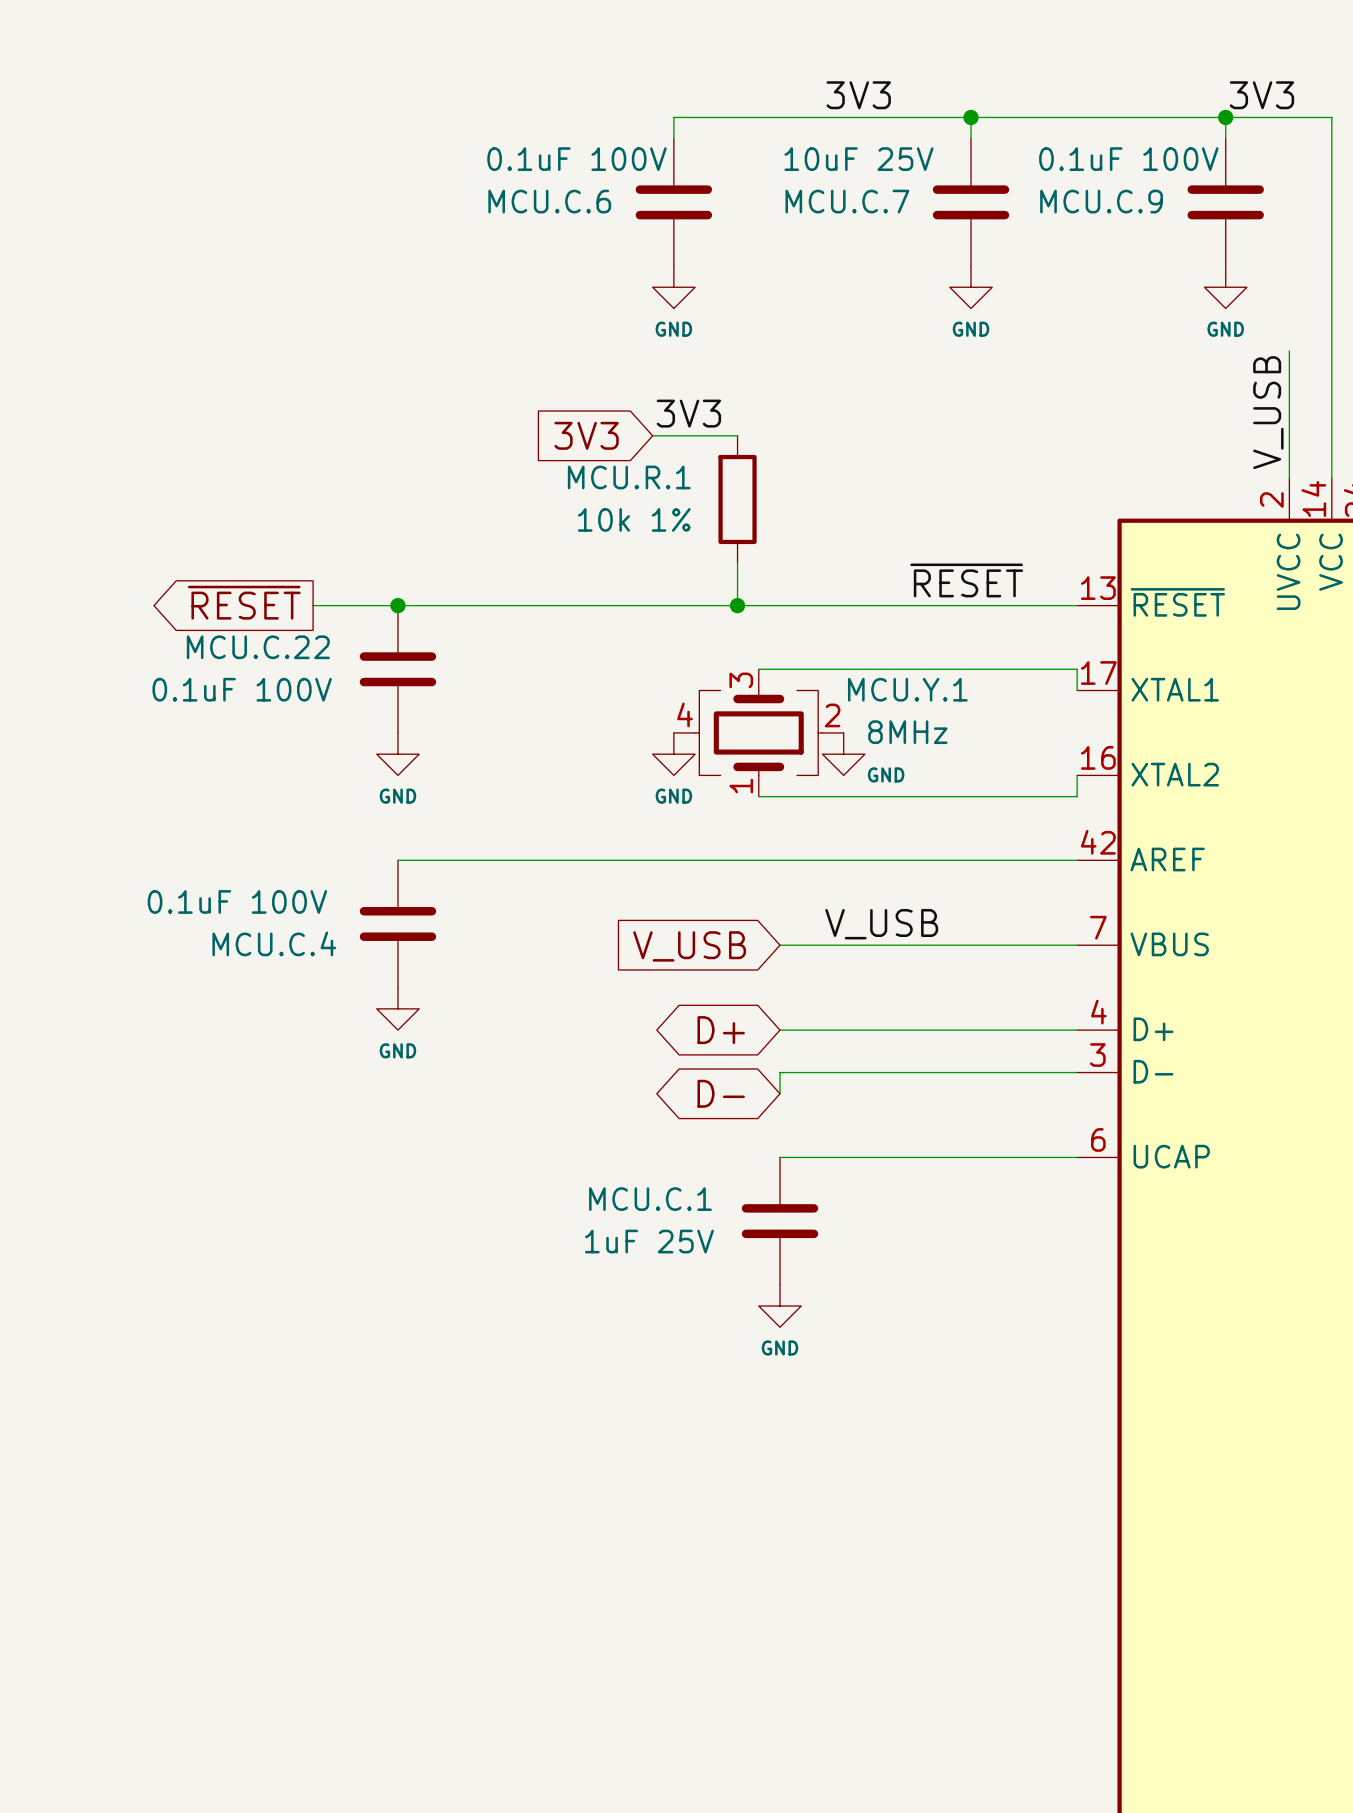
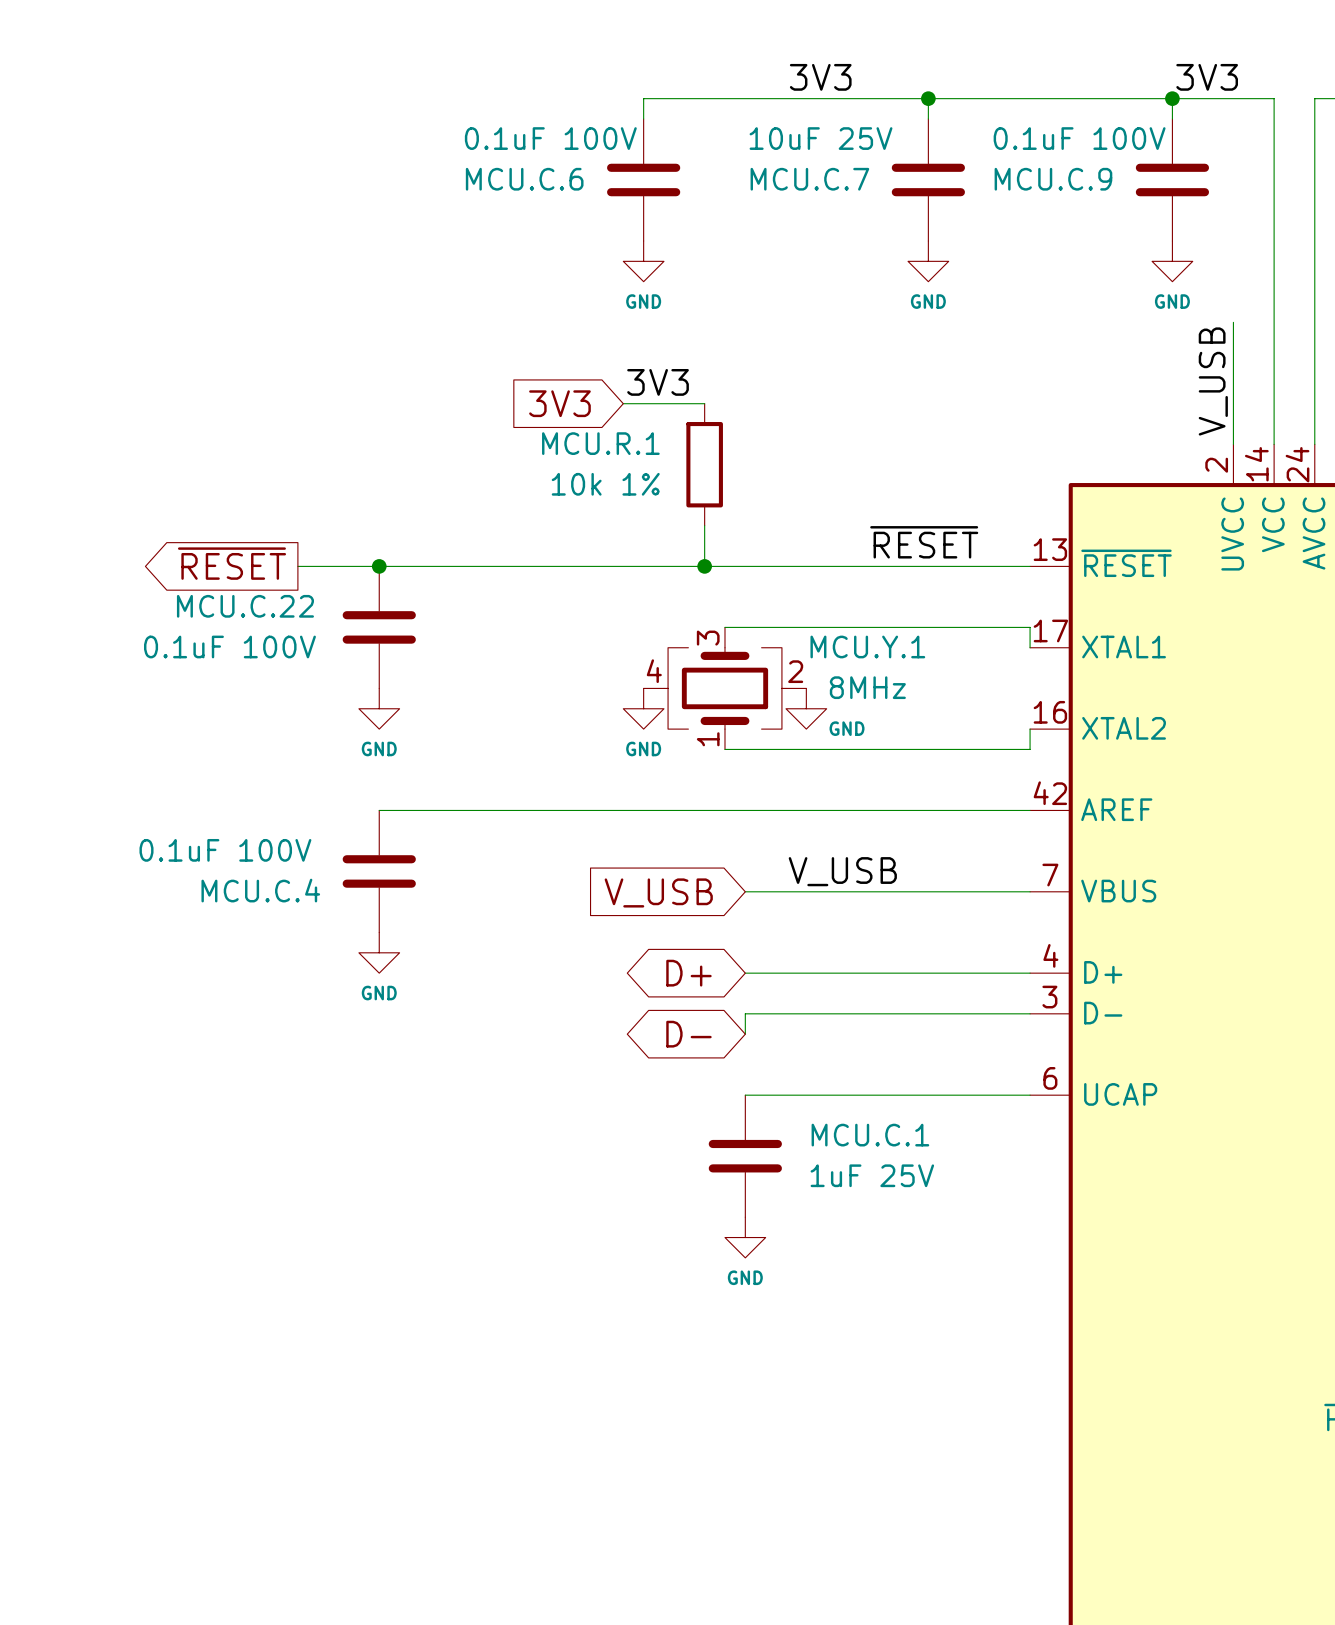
MCU.C.1 name position: MCU.C.1 (650, 1199) -> MCU.C.1 (870, 1135)
MCU.C.1 value position: 1uF 25V (649, 1241) -> 1uF 25V (872, 1175)

